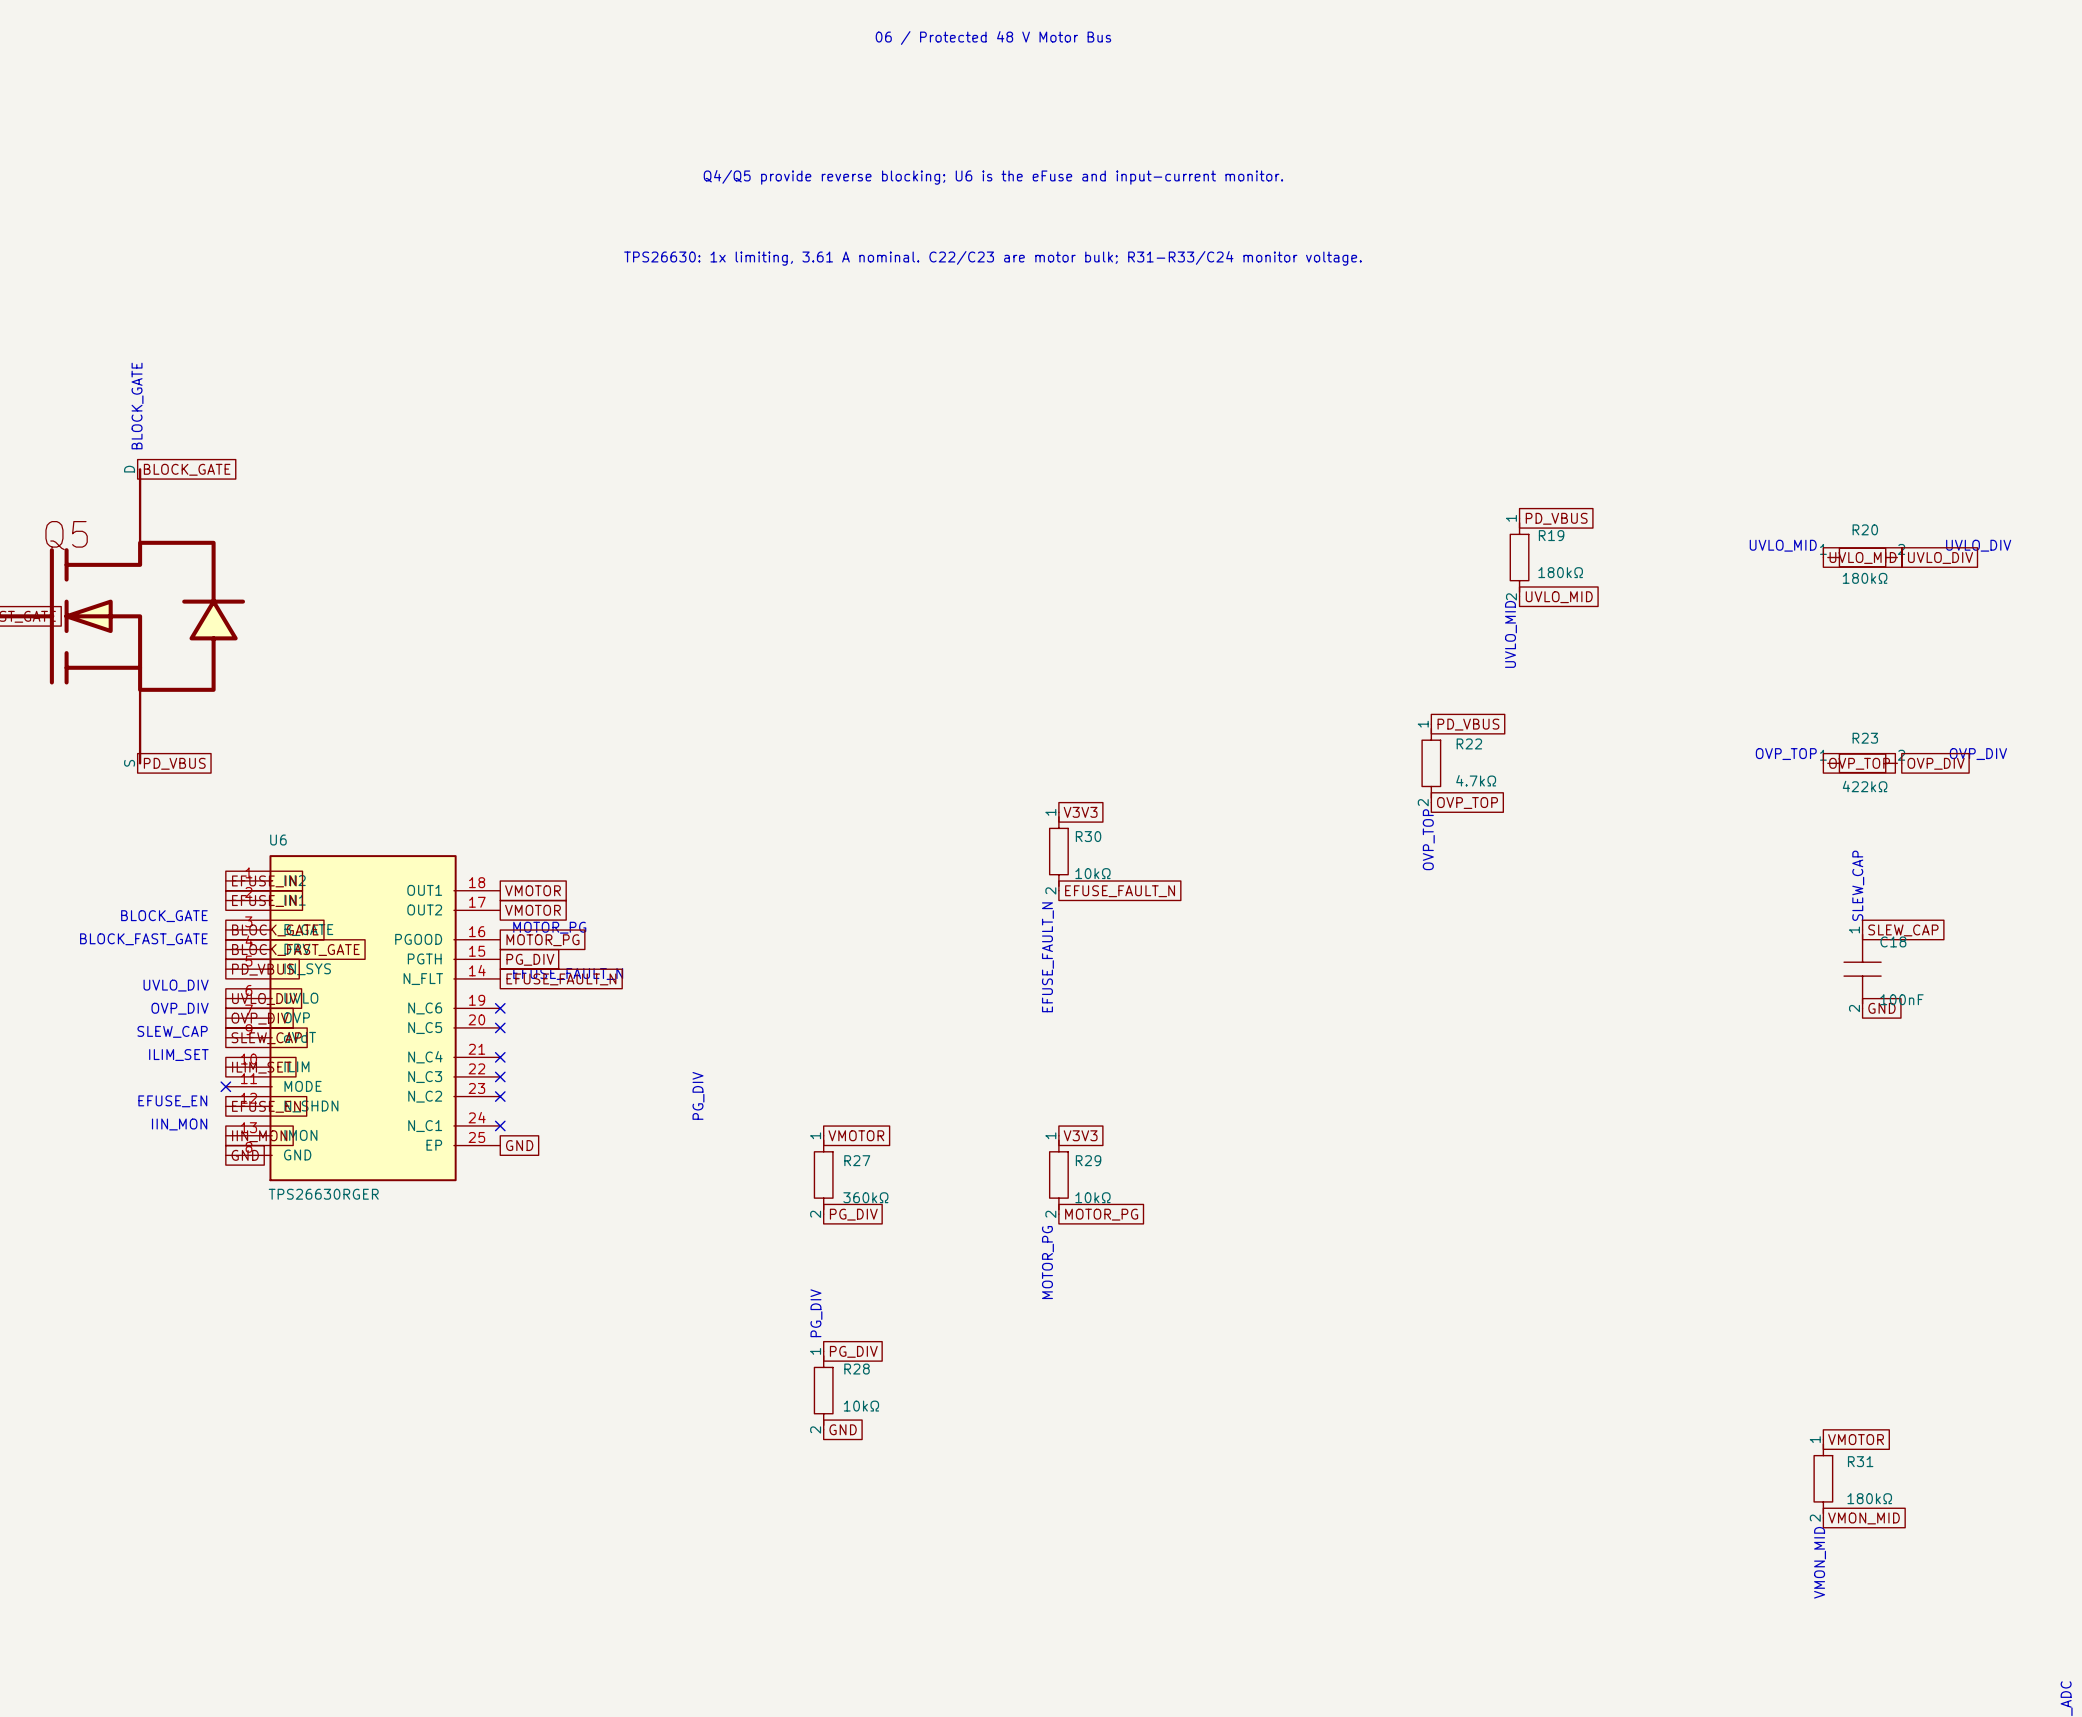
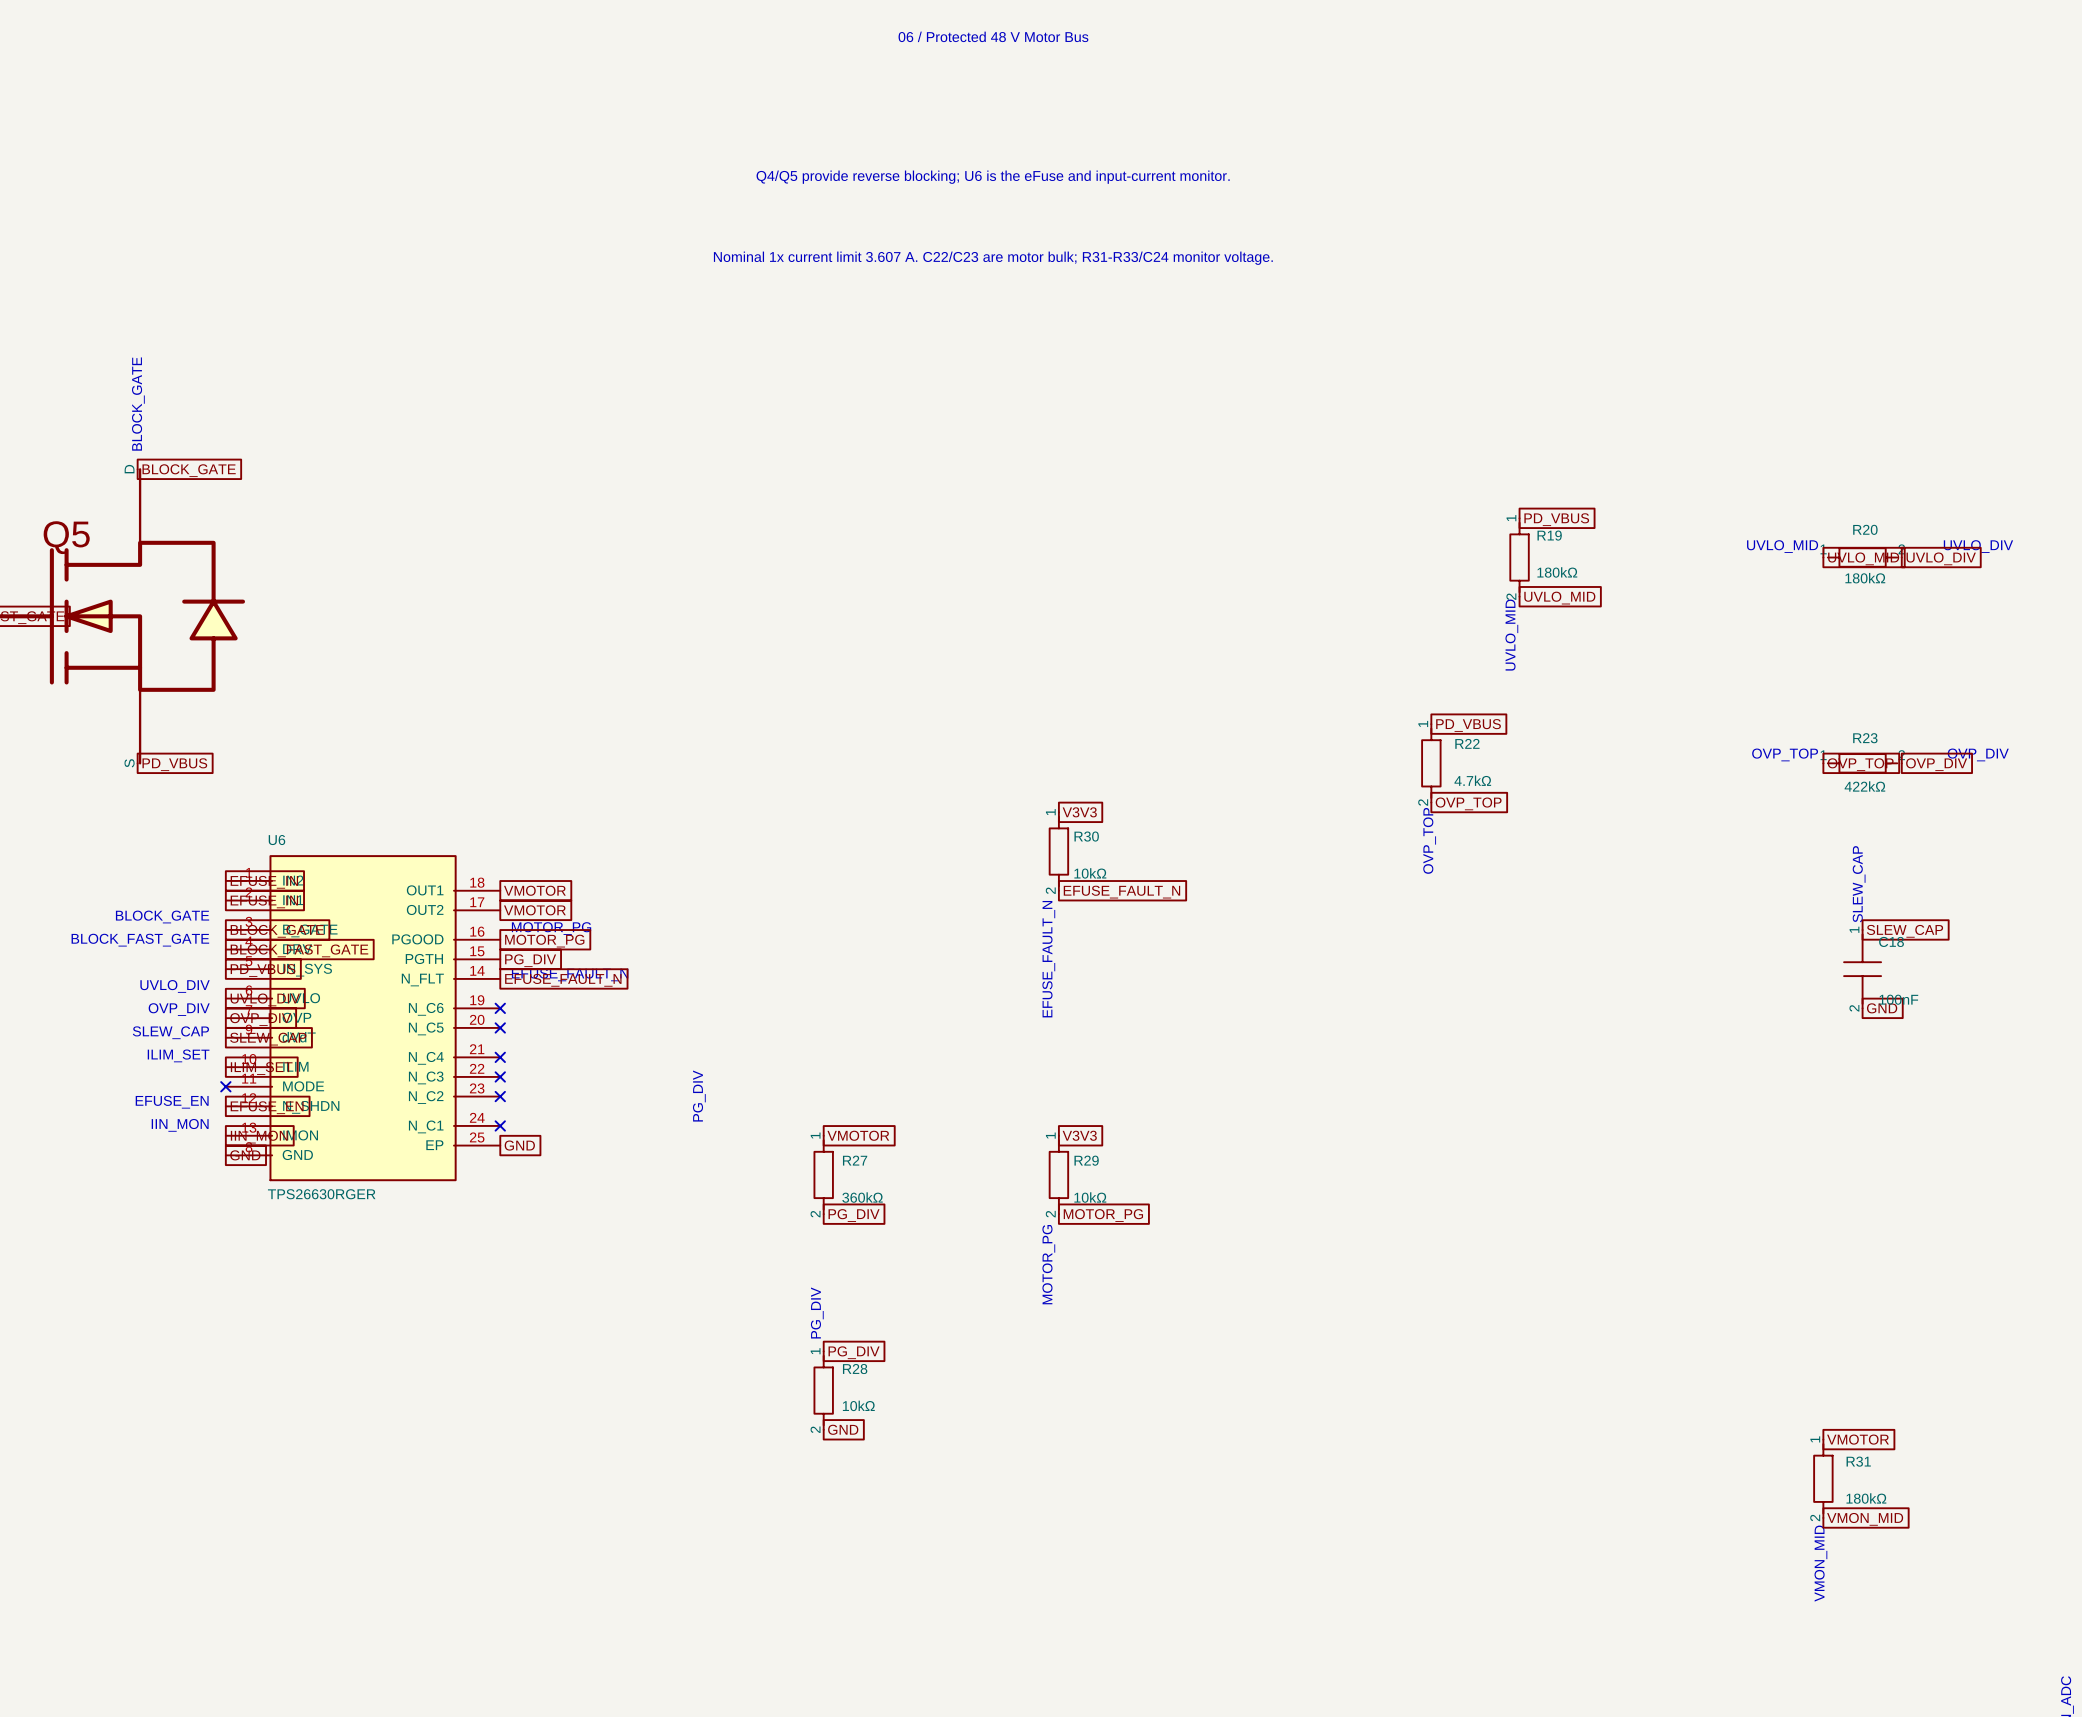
text: TPS26630: 1x limiting, 3.61 A nominal. C22/C23 are motor bulk; R31-R33/C24 monitor voltage. (992, 258) -> Nominal 1x current limit 3.607 A. C22/C23 are motor bulk; R31-R33/C24 monitor voltage. (993, 258)

